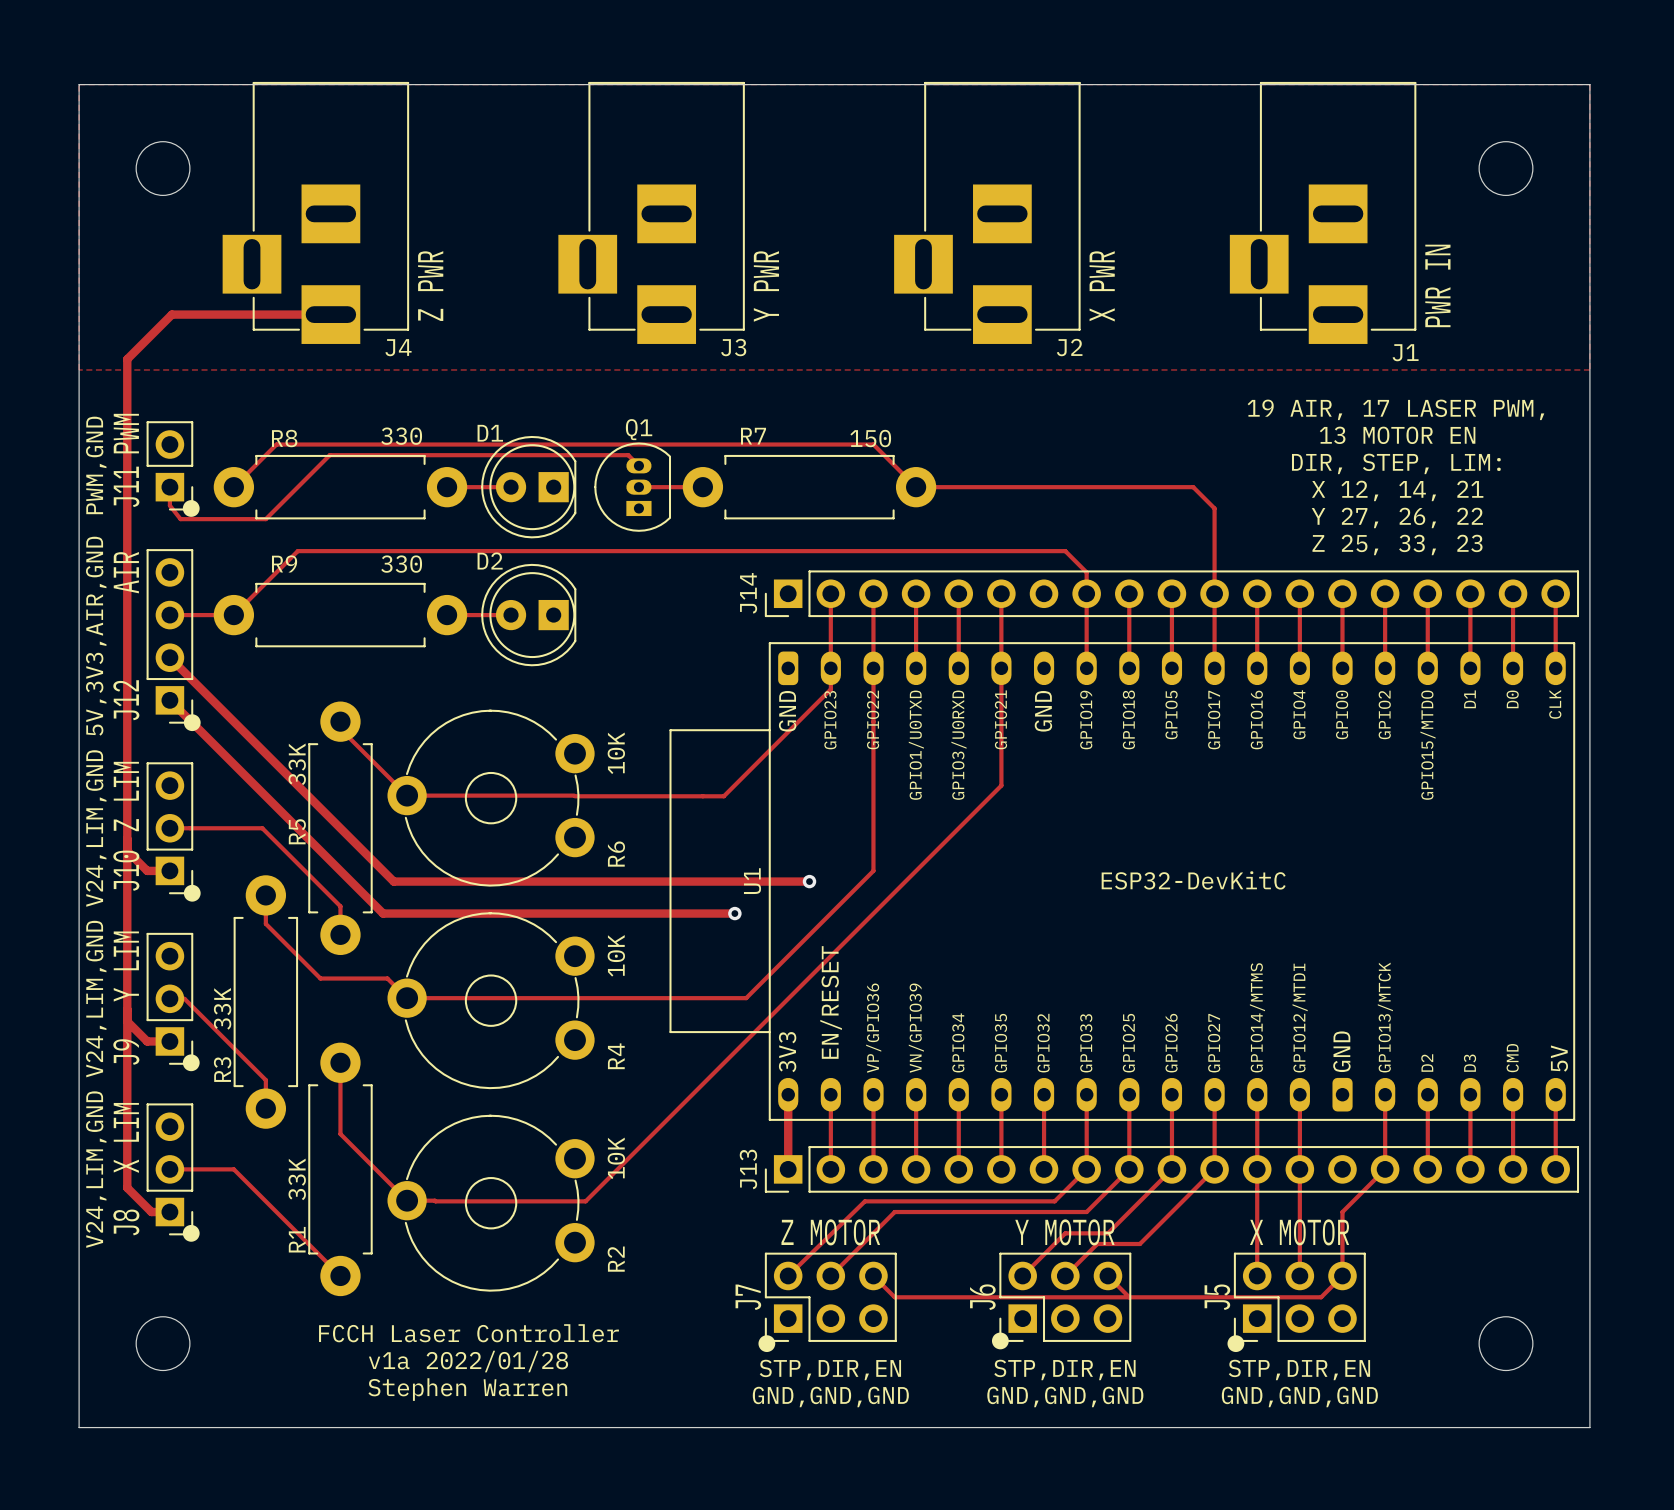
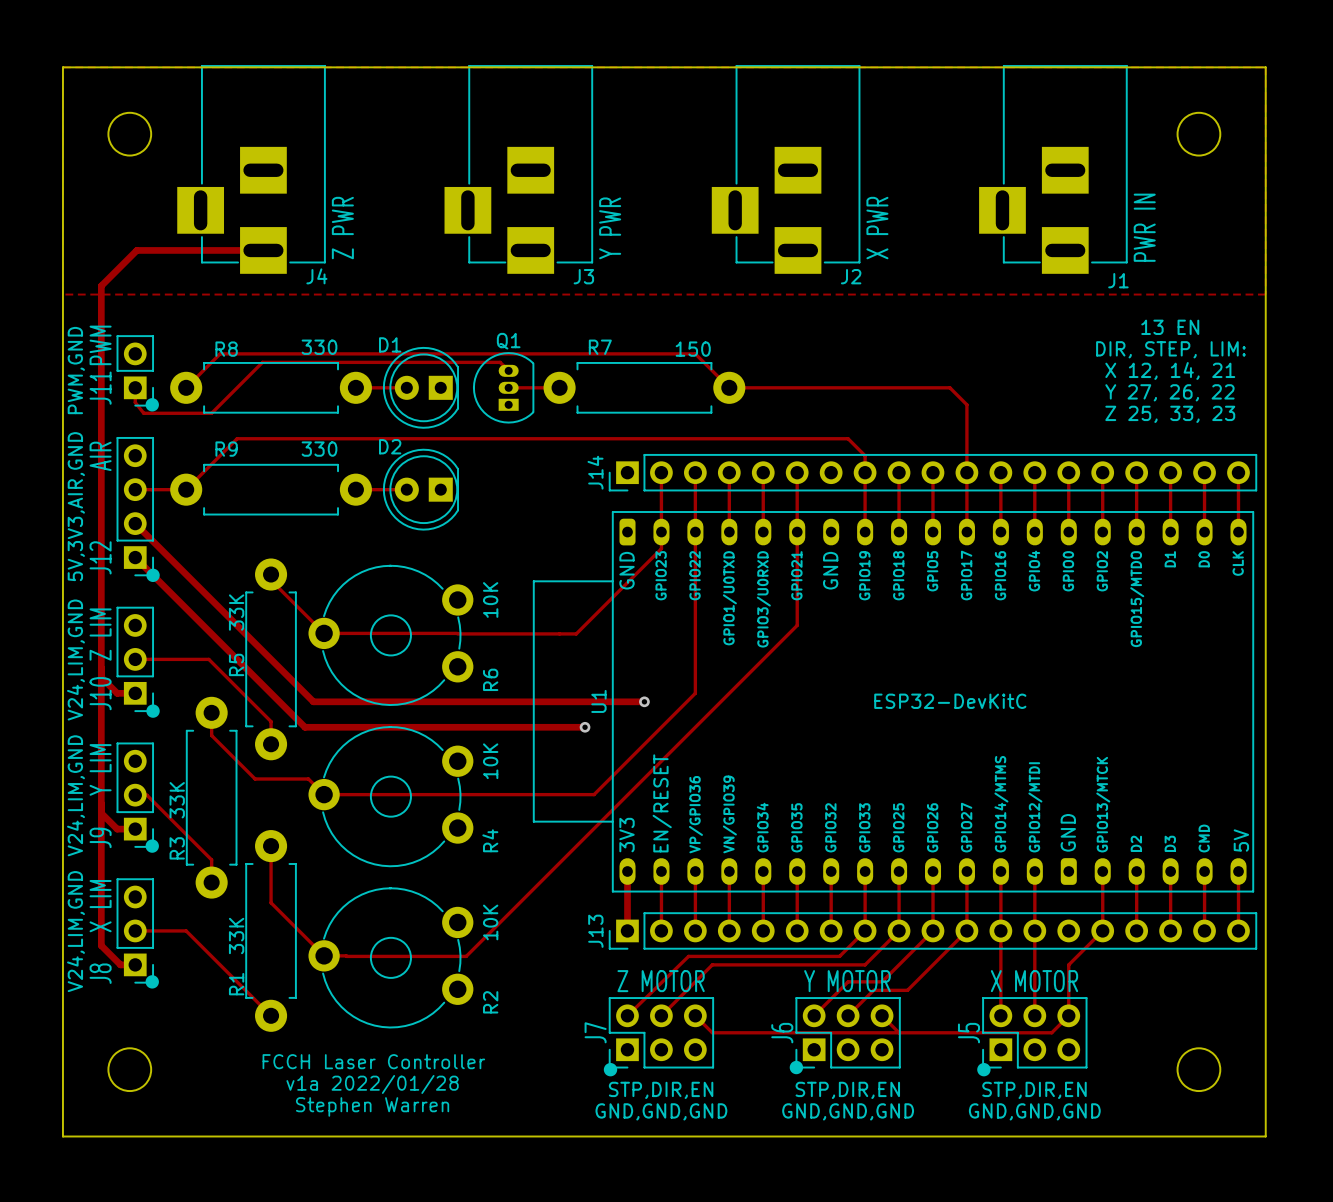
text: 19 AIR, 17 LASER PWM, (1395, 409) -> none
text: 13 MOTOR EN (1397, 435) -> 13 EN (1170, 327)
text position: DIR, STEP, LIM: (1396, 463) -> DIR, STEP, LIM: (1170, 349)
text position: X 12, 14, 21 (1397, 490) -> X 12, 14, 21 (1170, 370)
text position: Y 27, 26, 22 (1397, 517) -> Y 27, 26, 22 (1169, 392)
text position: Z 25, 33, 23 (1397, 544) -> Z 25, 33, 23 (1170, 414)

